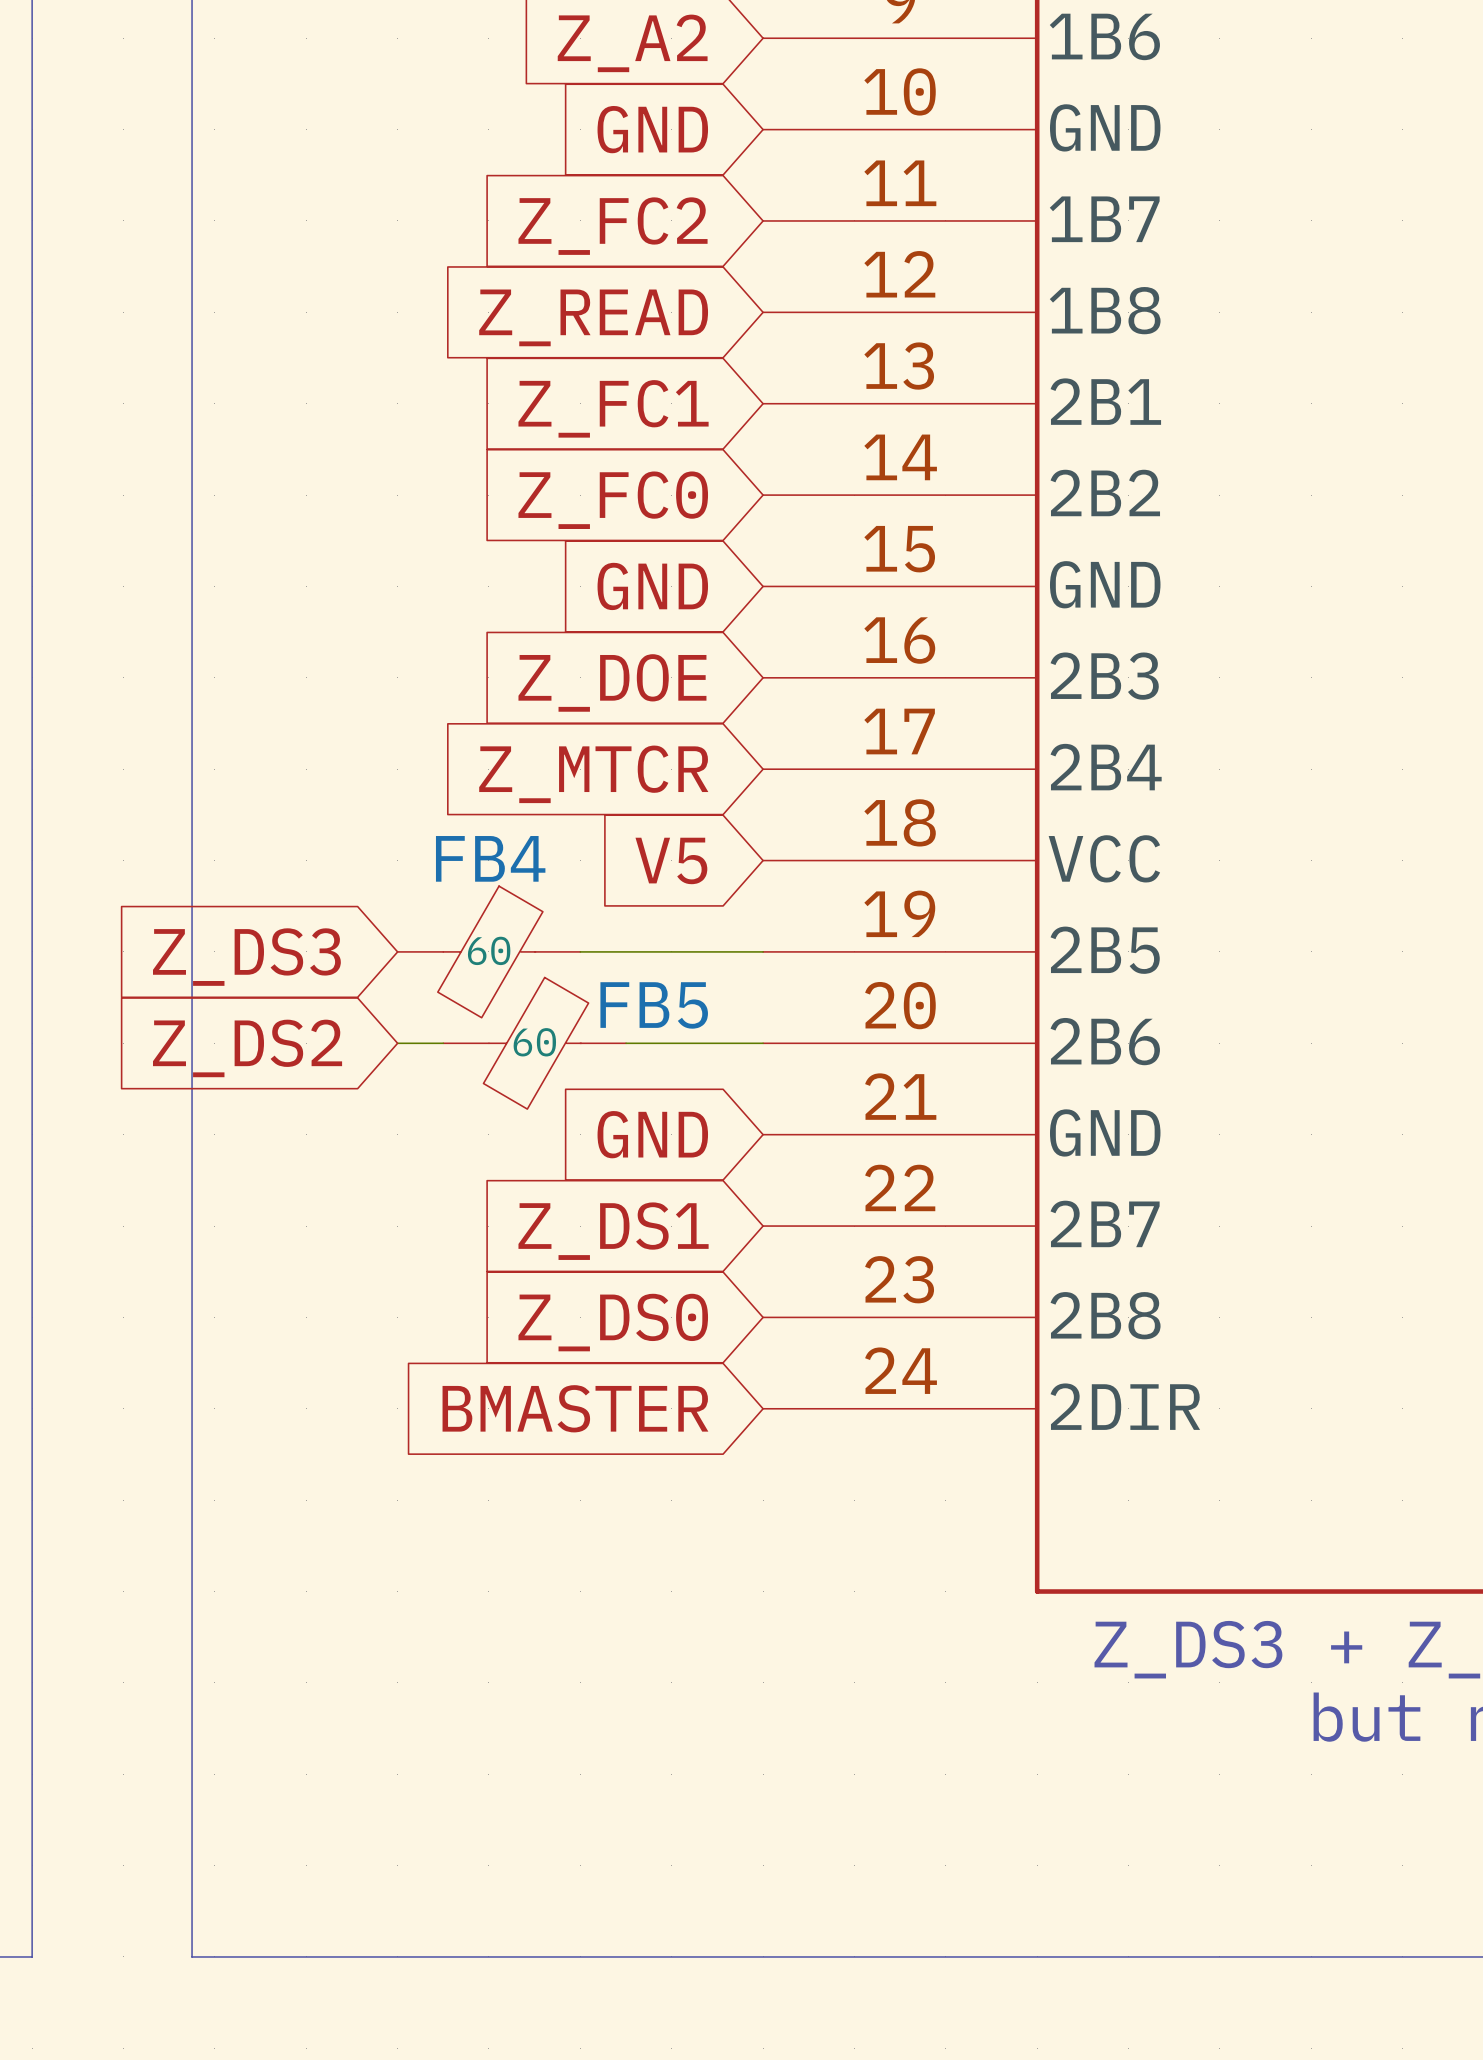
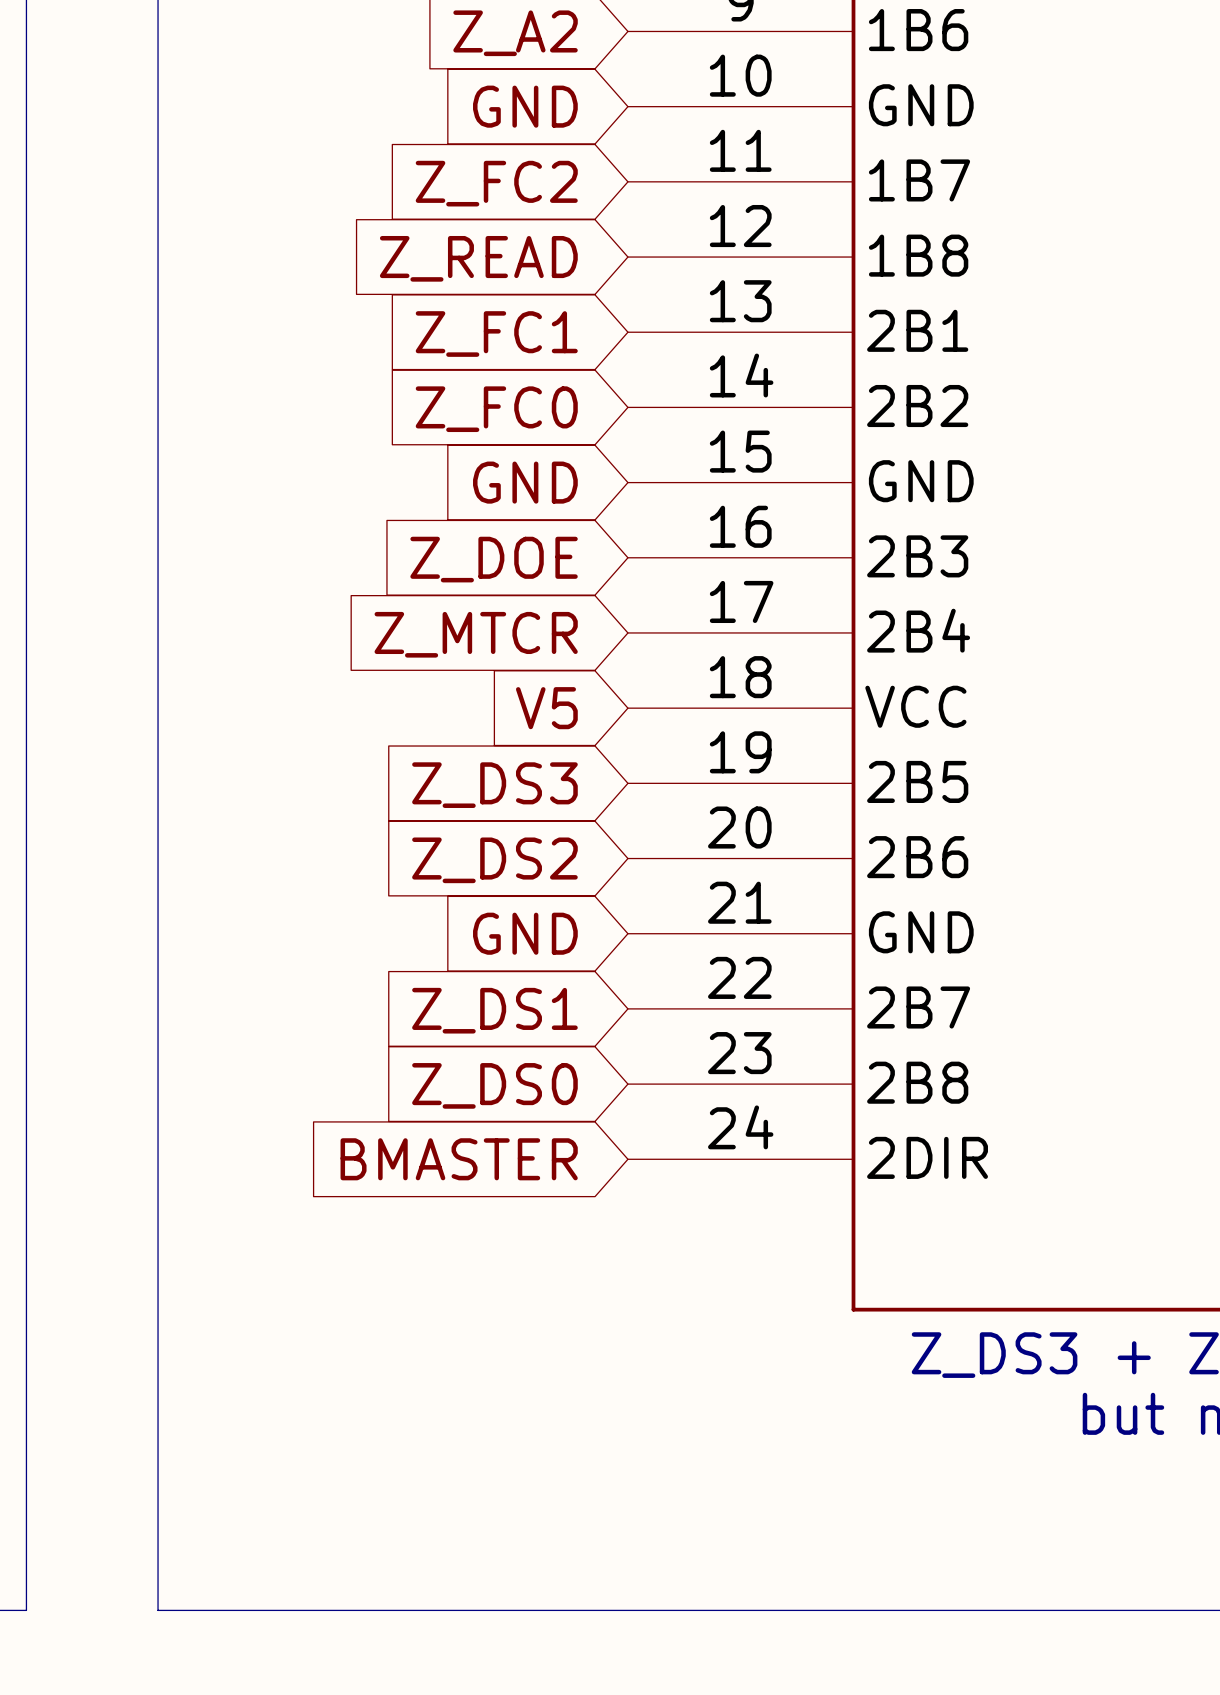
FB4: 60 (488, 951) -> none
wire: (580, 951) (763, 951) -> none
global label position: Z_DS3 (246, 957) -> Z_DS3 (494, 785)
wire: (397, 1043) (443, 1043) -> none
FB5: 60 (534, 1043) -> none
wire: (626, 1043) (763, 1043) -> none
global label position: Z_DS2 (247, 1048) -> Z_DS2 (494, 860)

